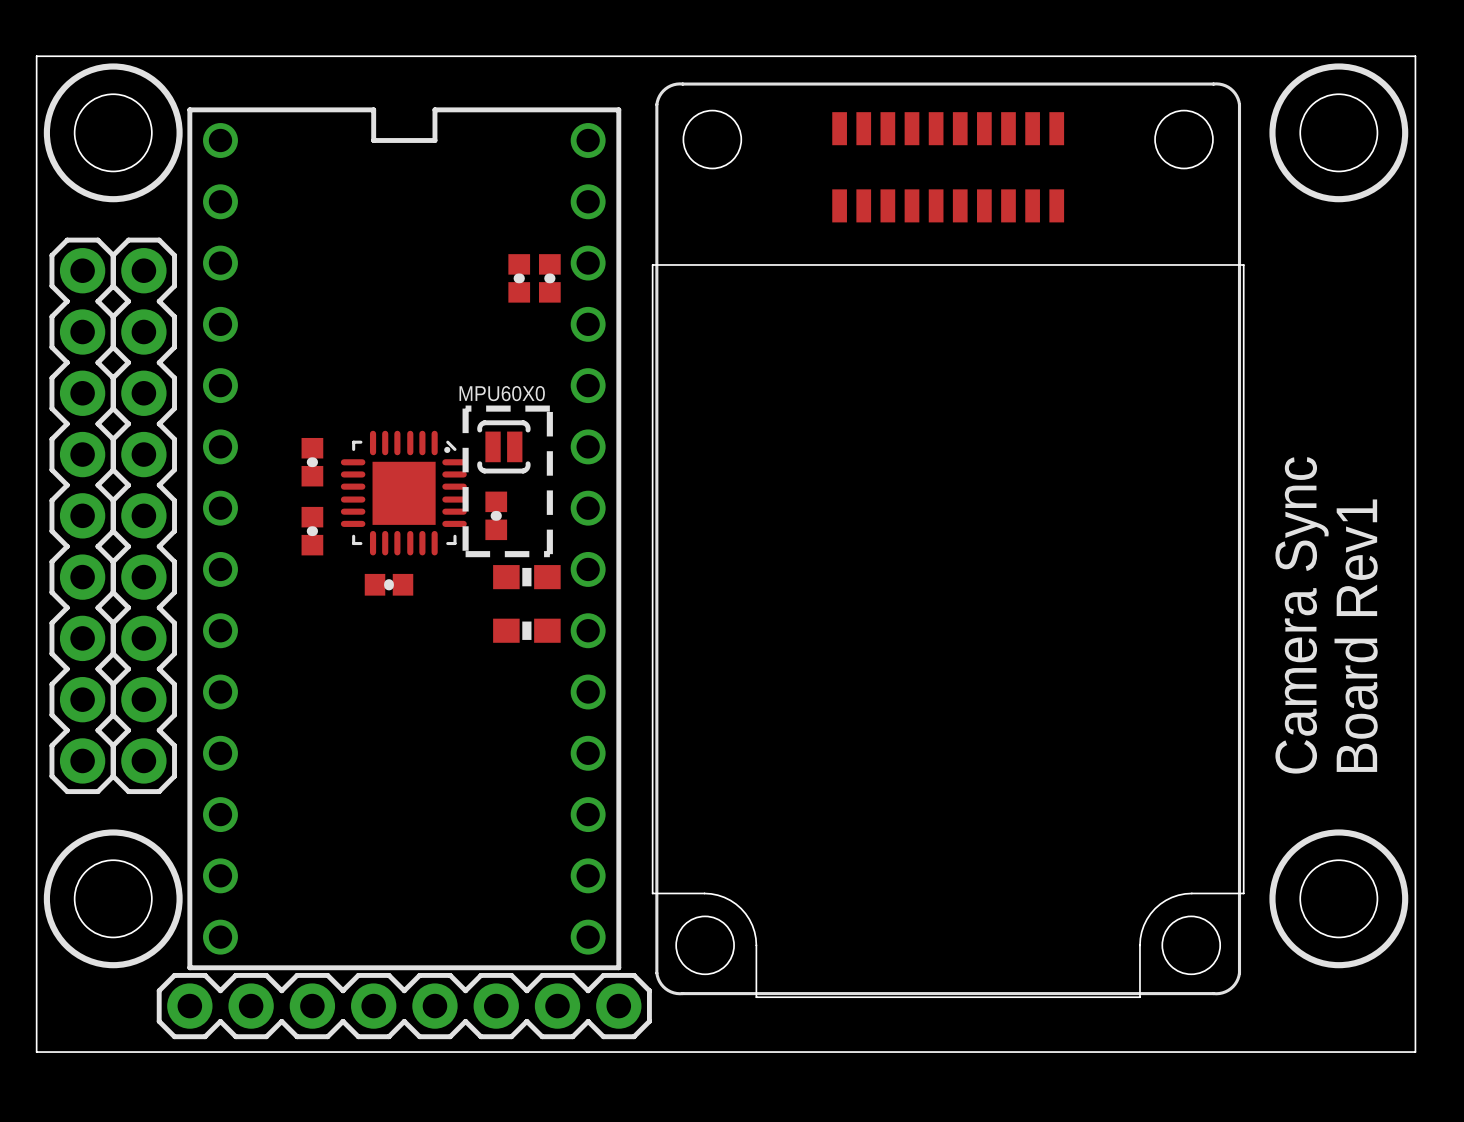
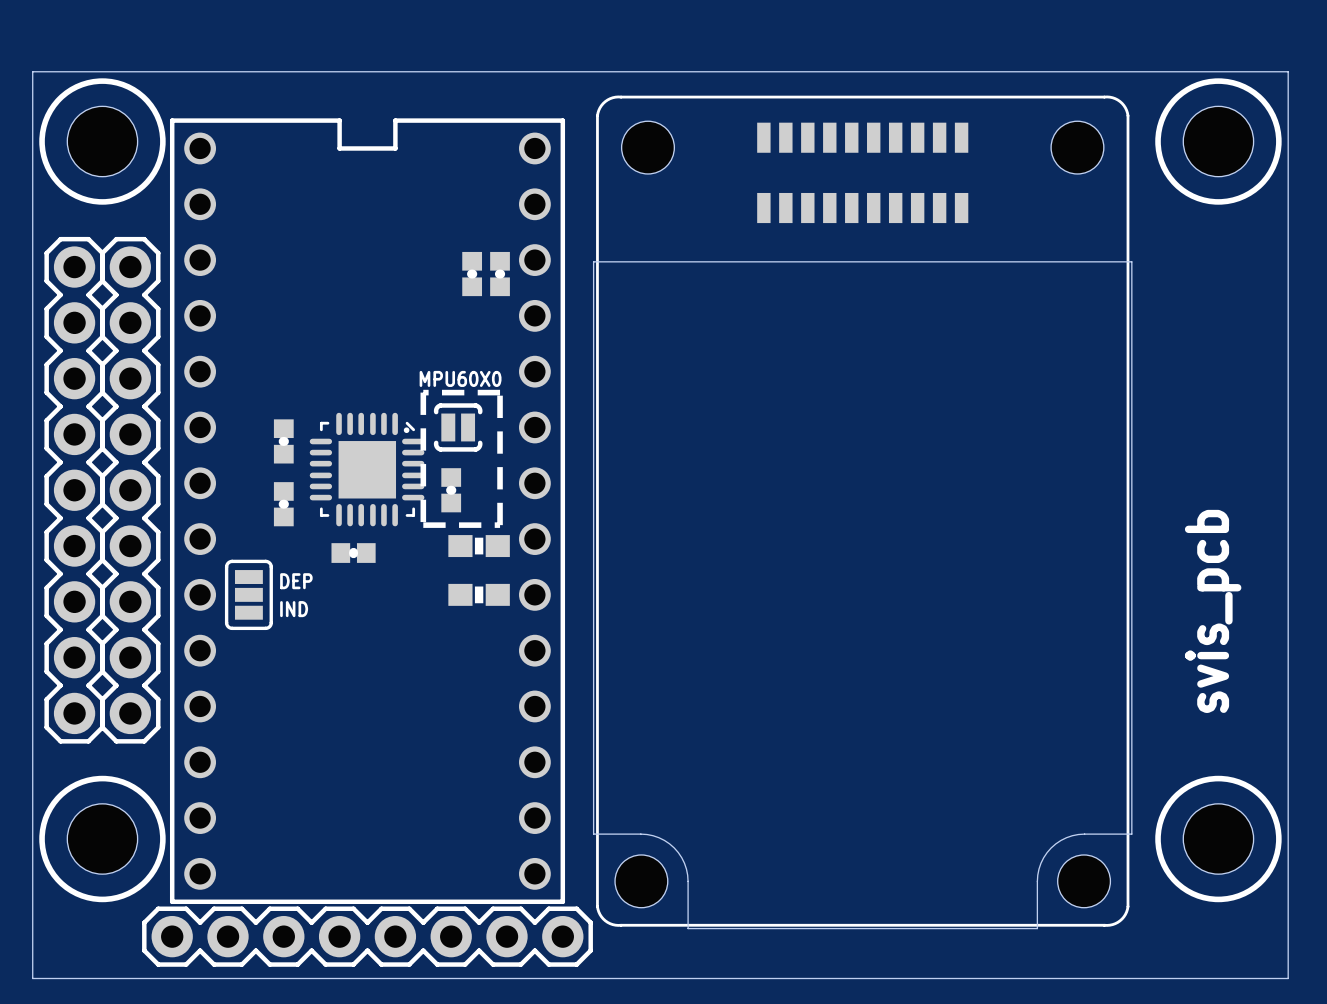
text: none -> DEP (296, 581)
text: Camera Sync (1302, 615) -> none
part: none -> (248, 594)
text: Board Rev1 (1356, 635) -> none
text: none -> IND (294, 609)
text: none -> svis_pcb (1213, 611)

